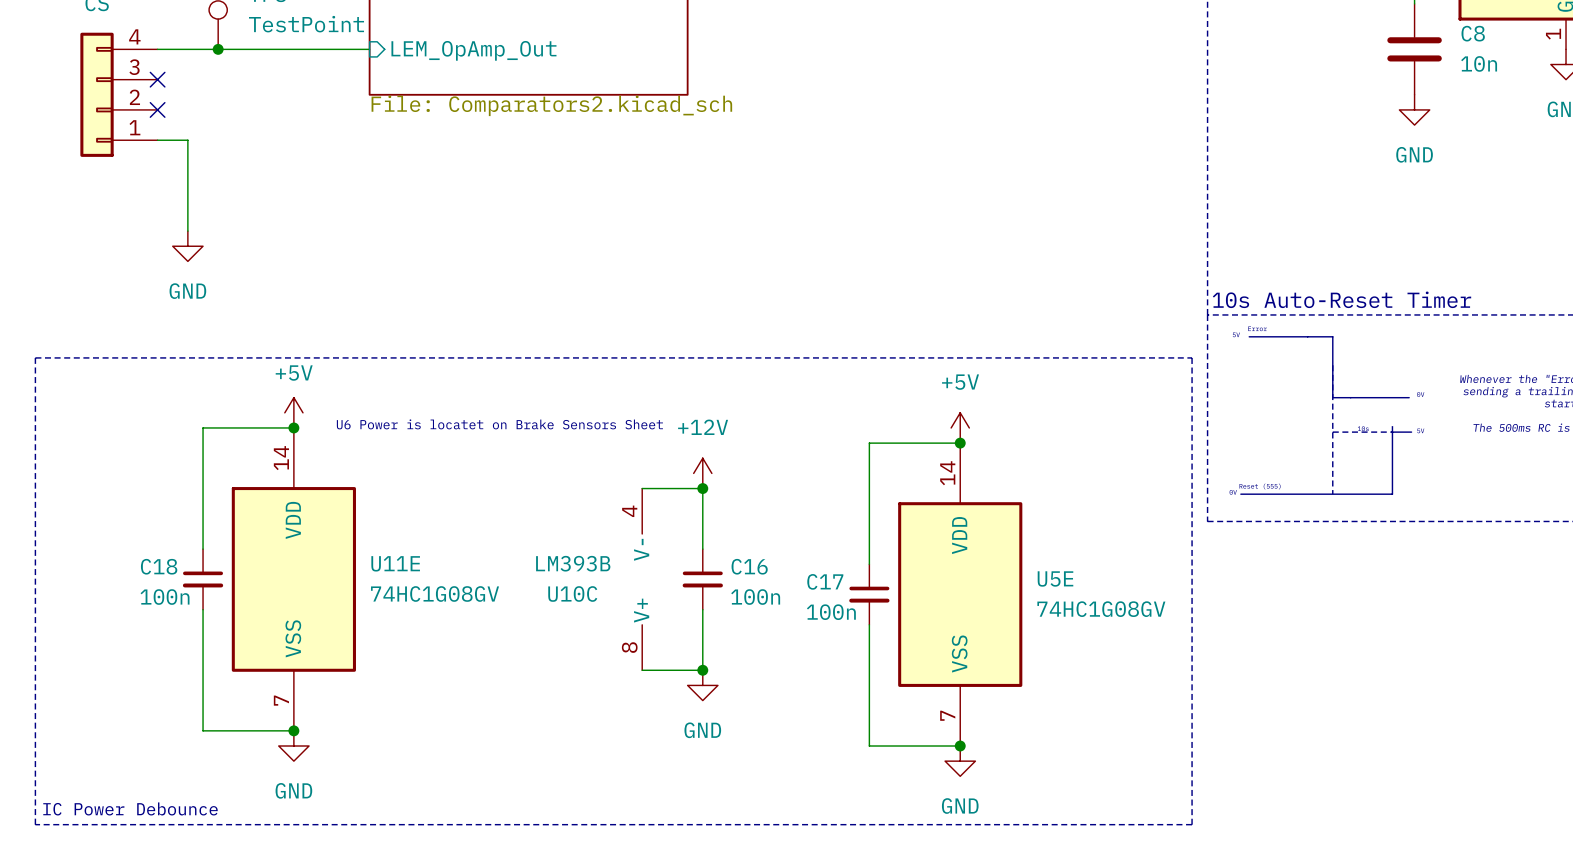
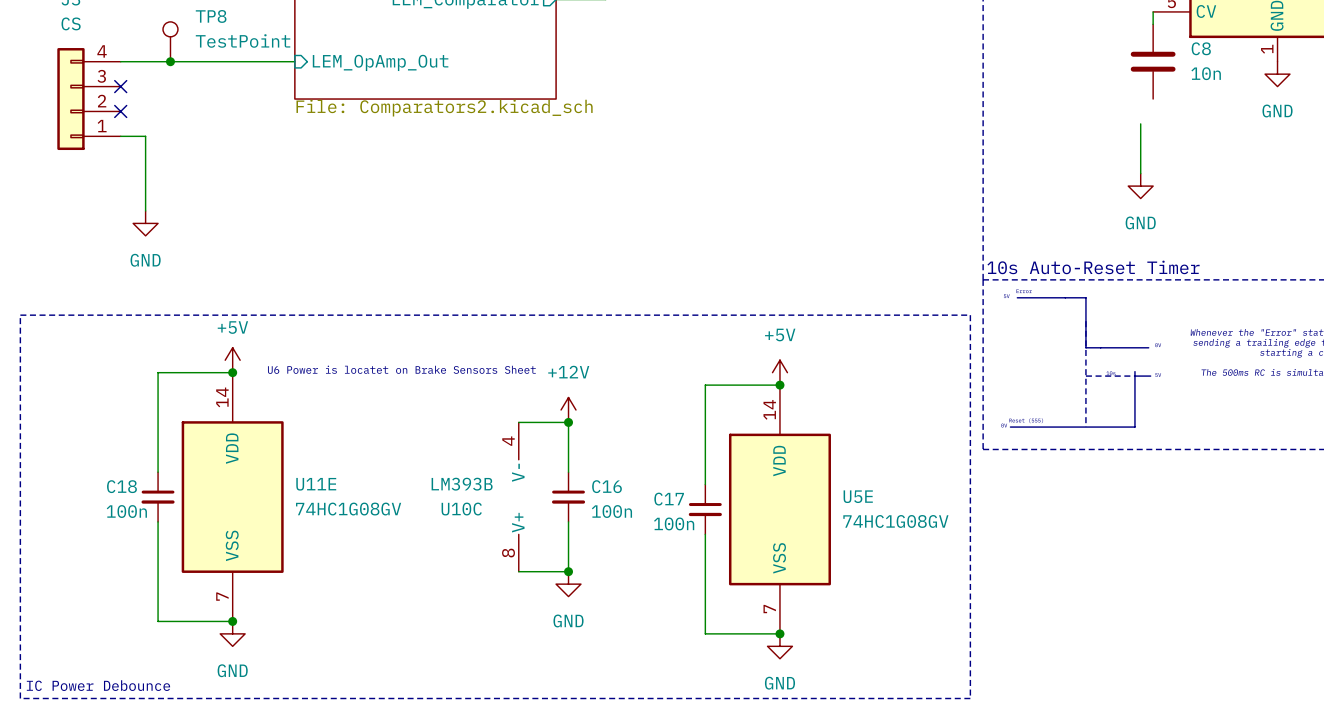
power symbol position: GND (1414, 109) -> GND (1140, 186)
wire: none -> (1140, 123) (1140, 173)

